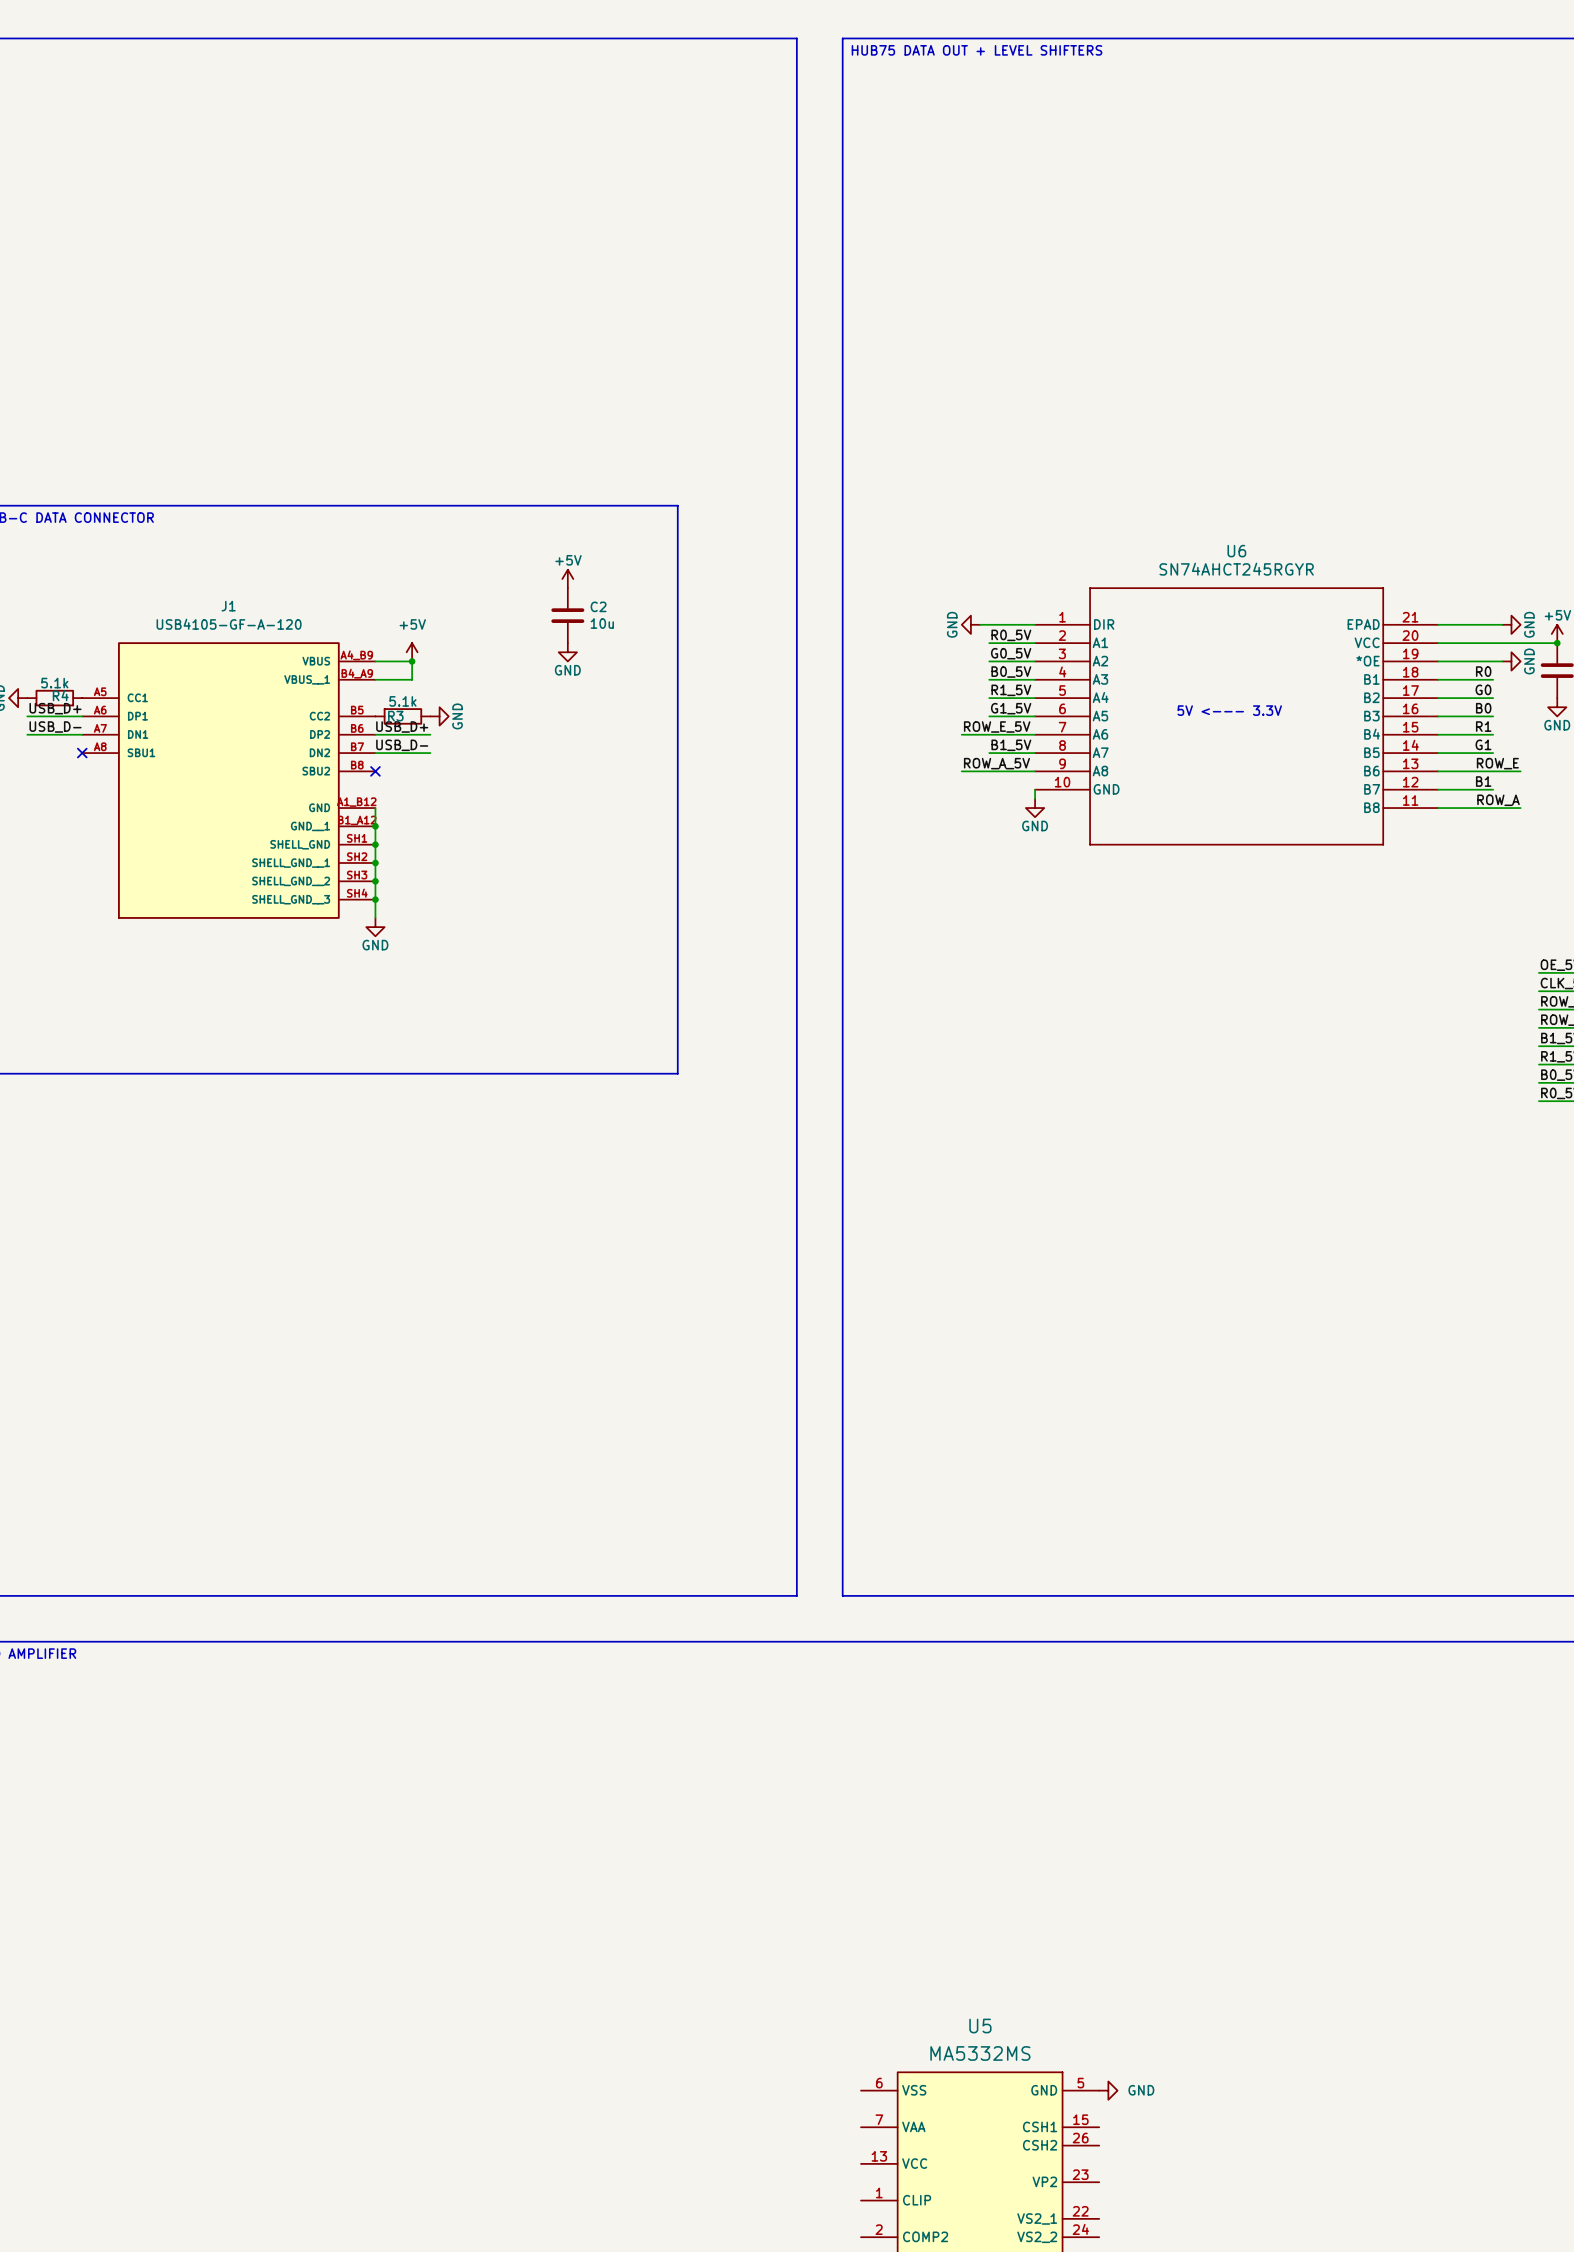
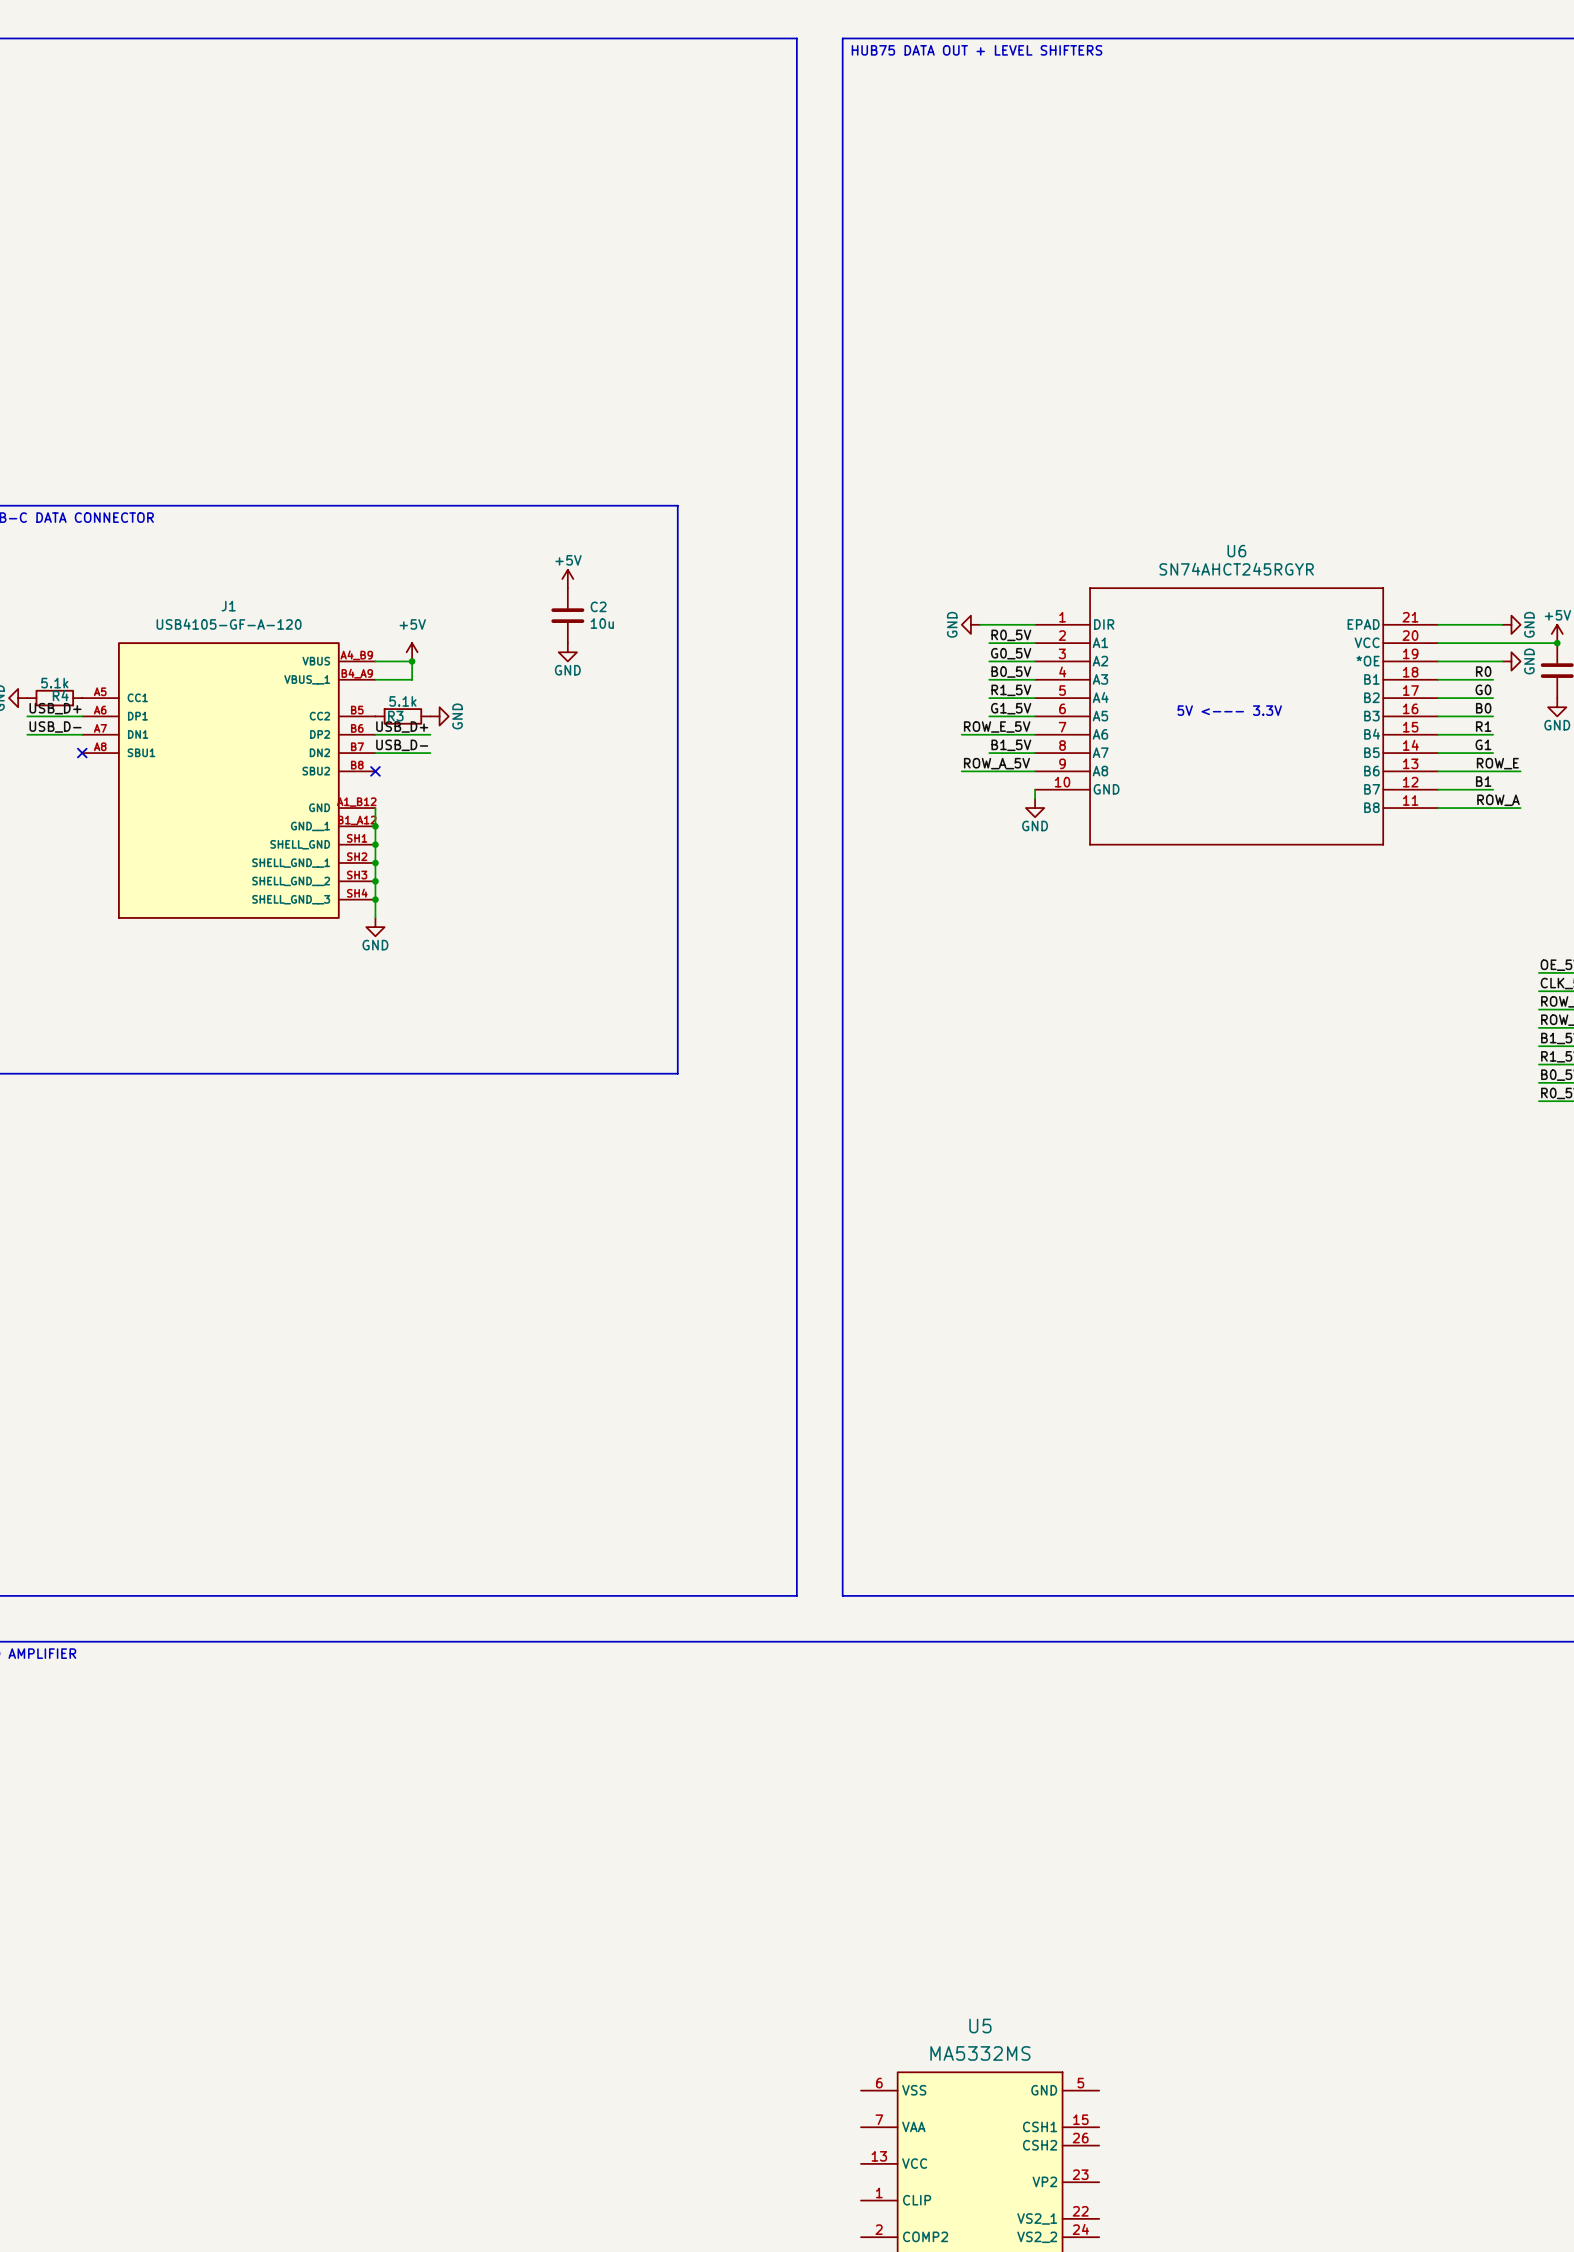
power symbol: GND (1108, 2090) -> none

